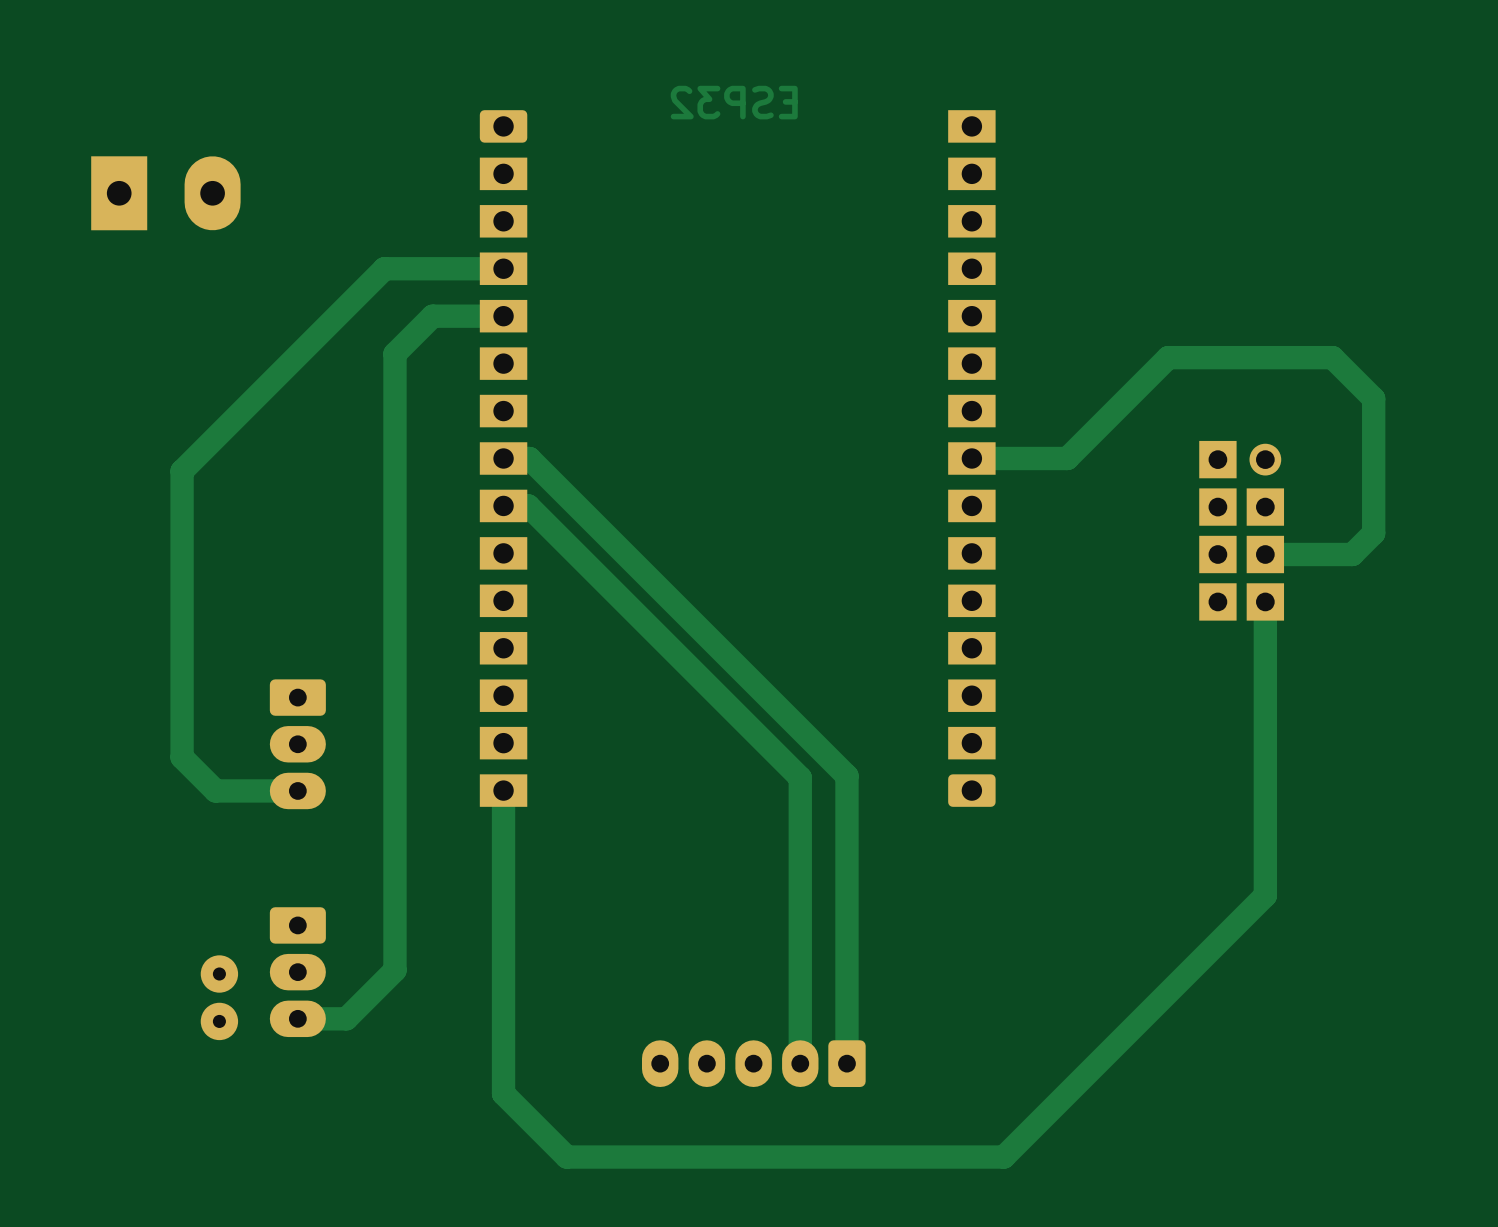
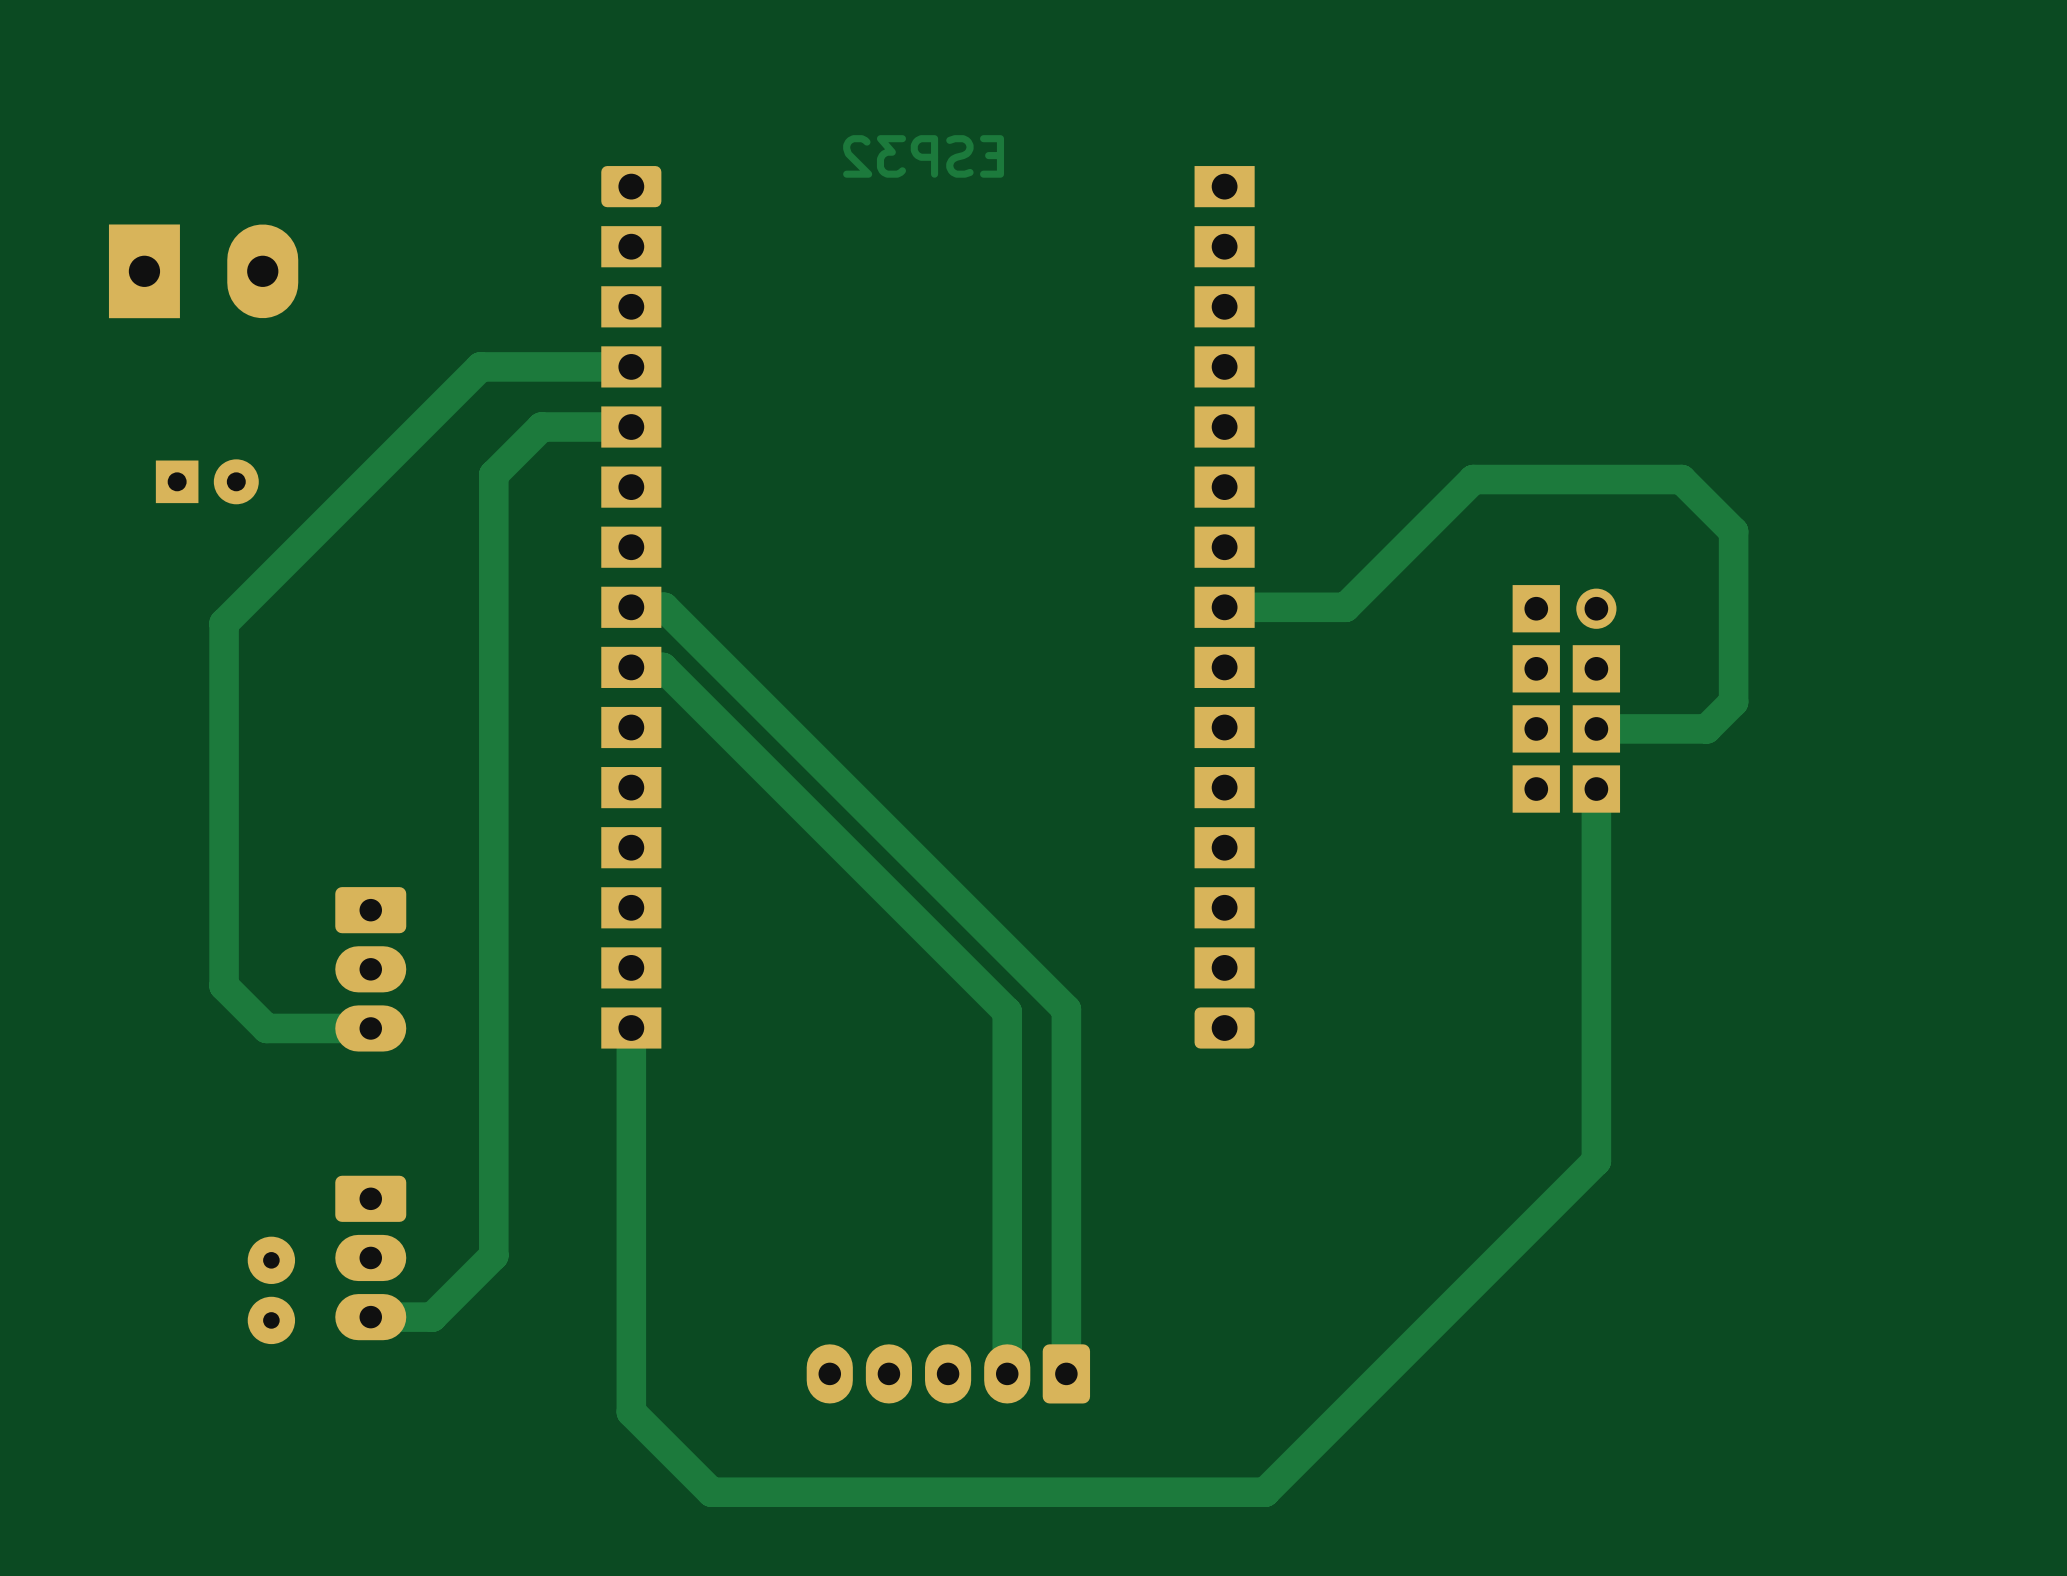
part: none -> (207, 481)

